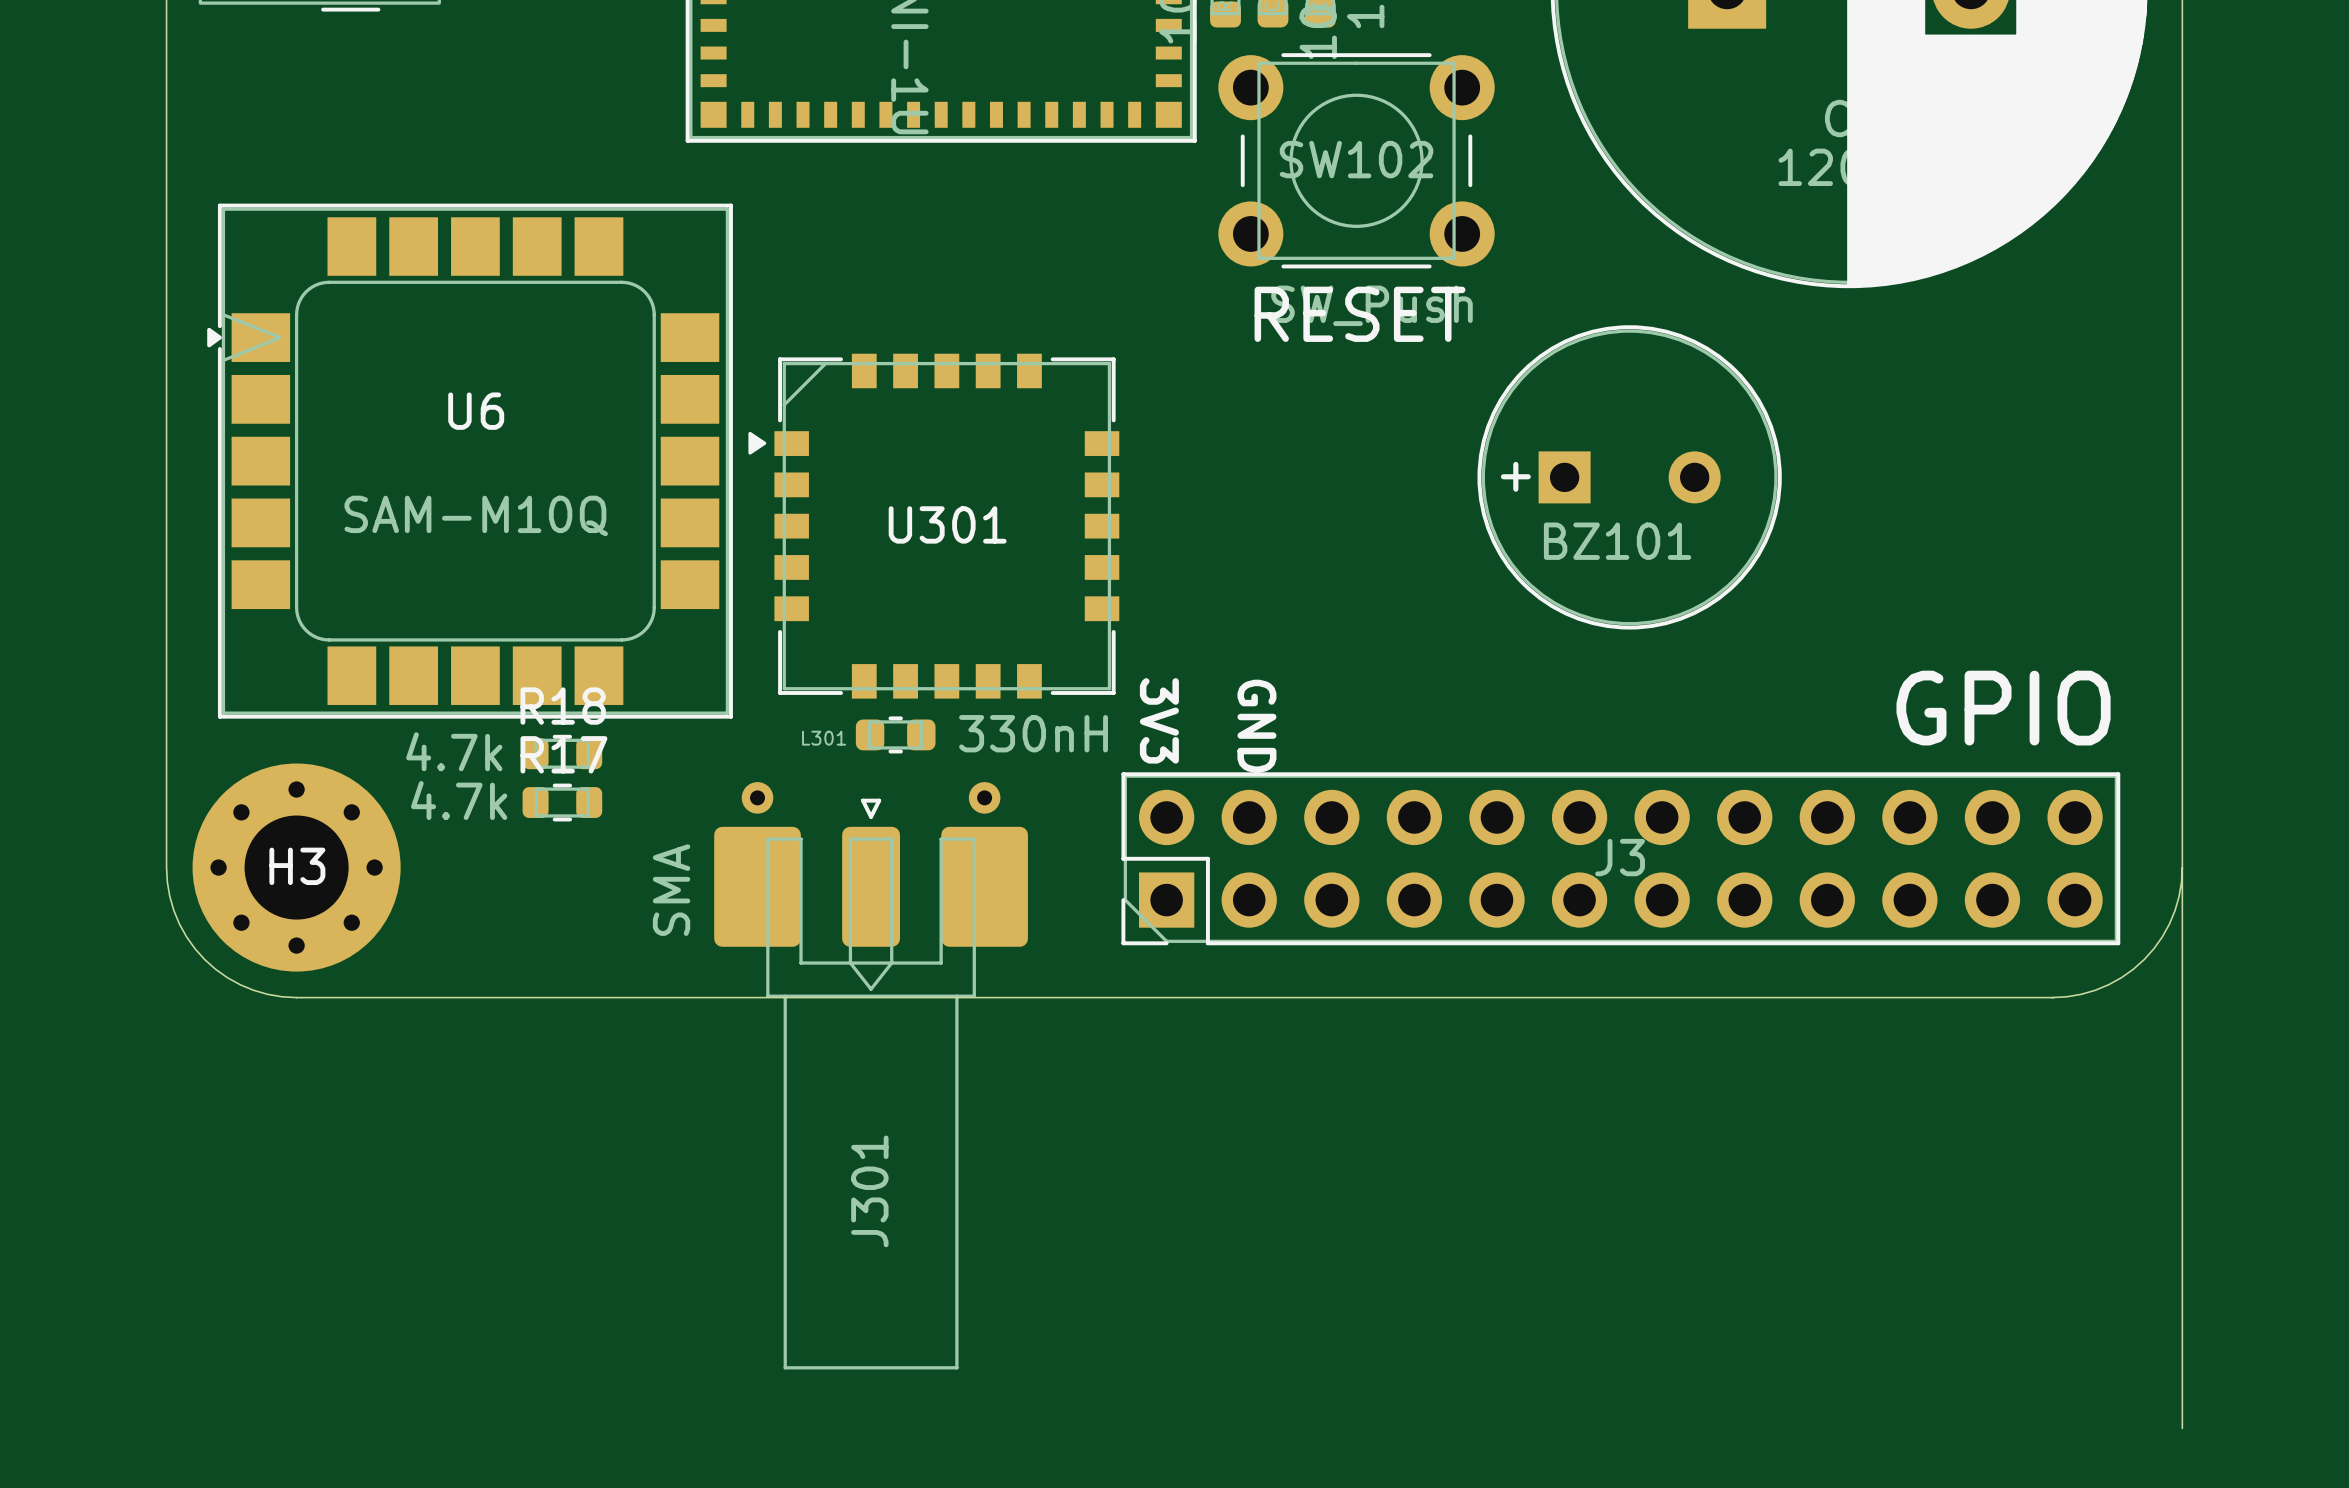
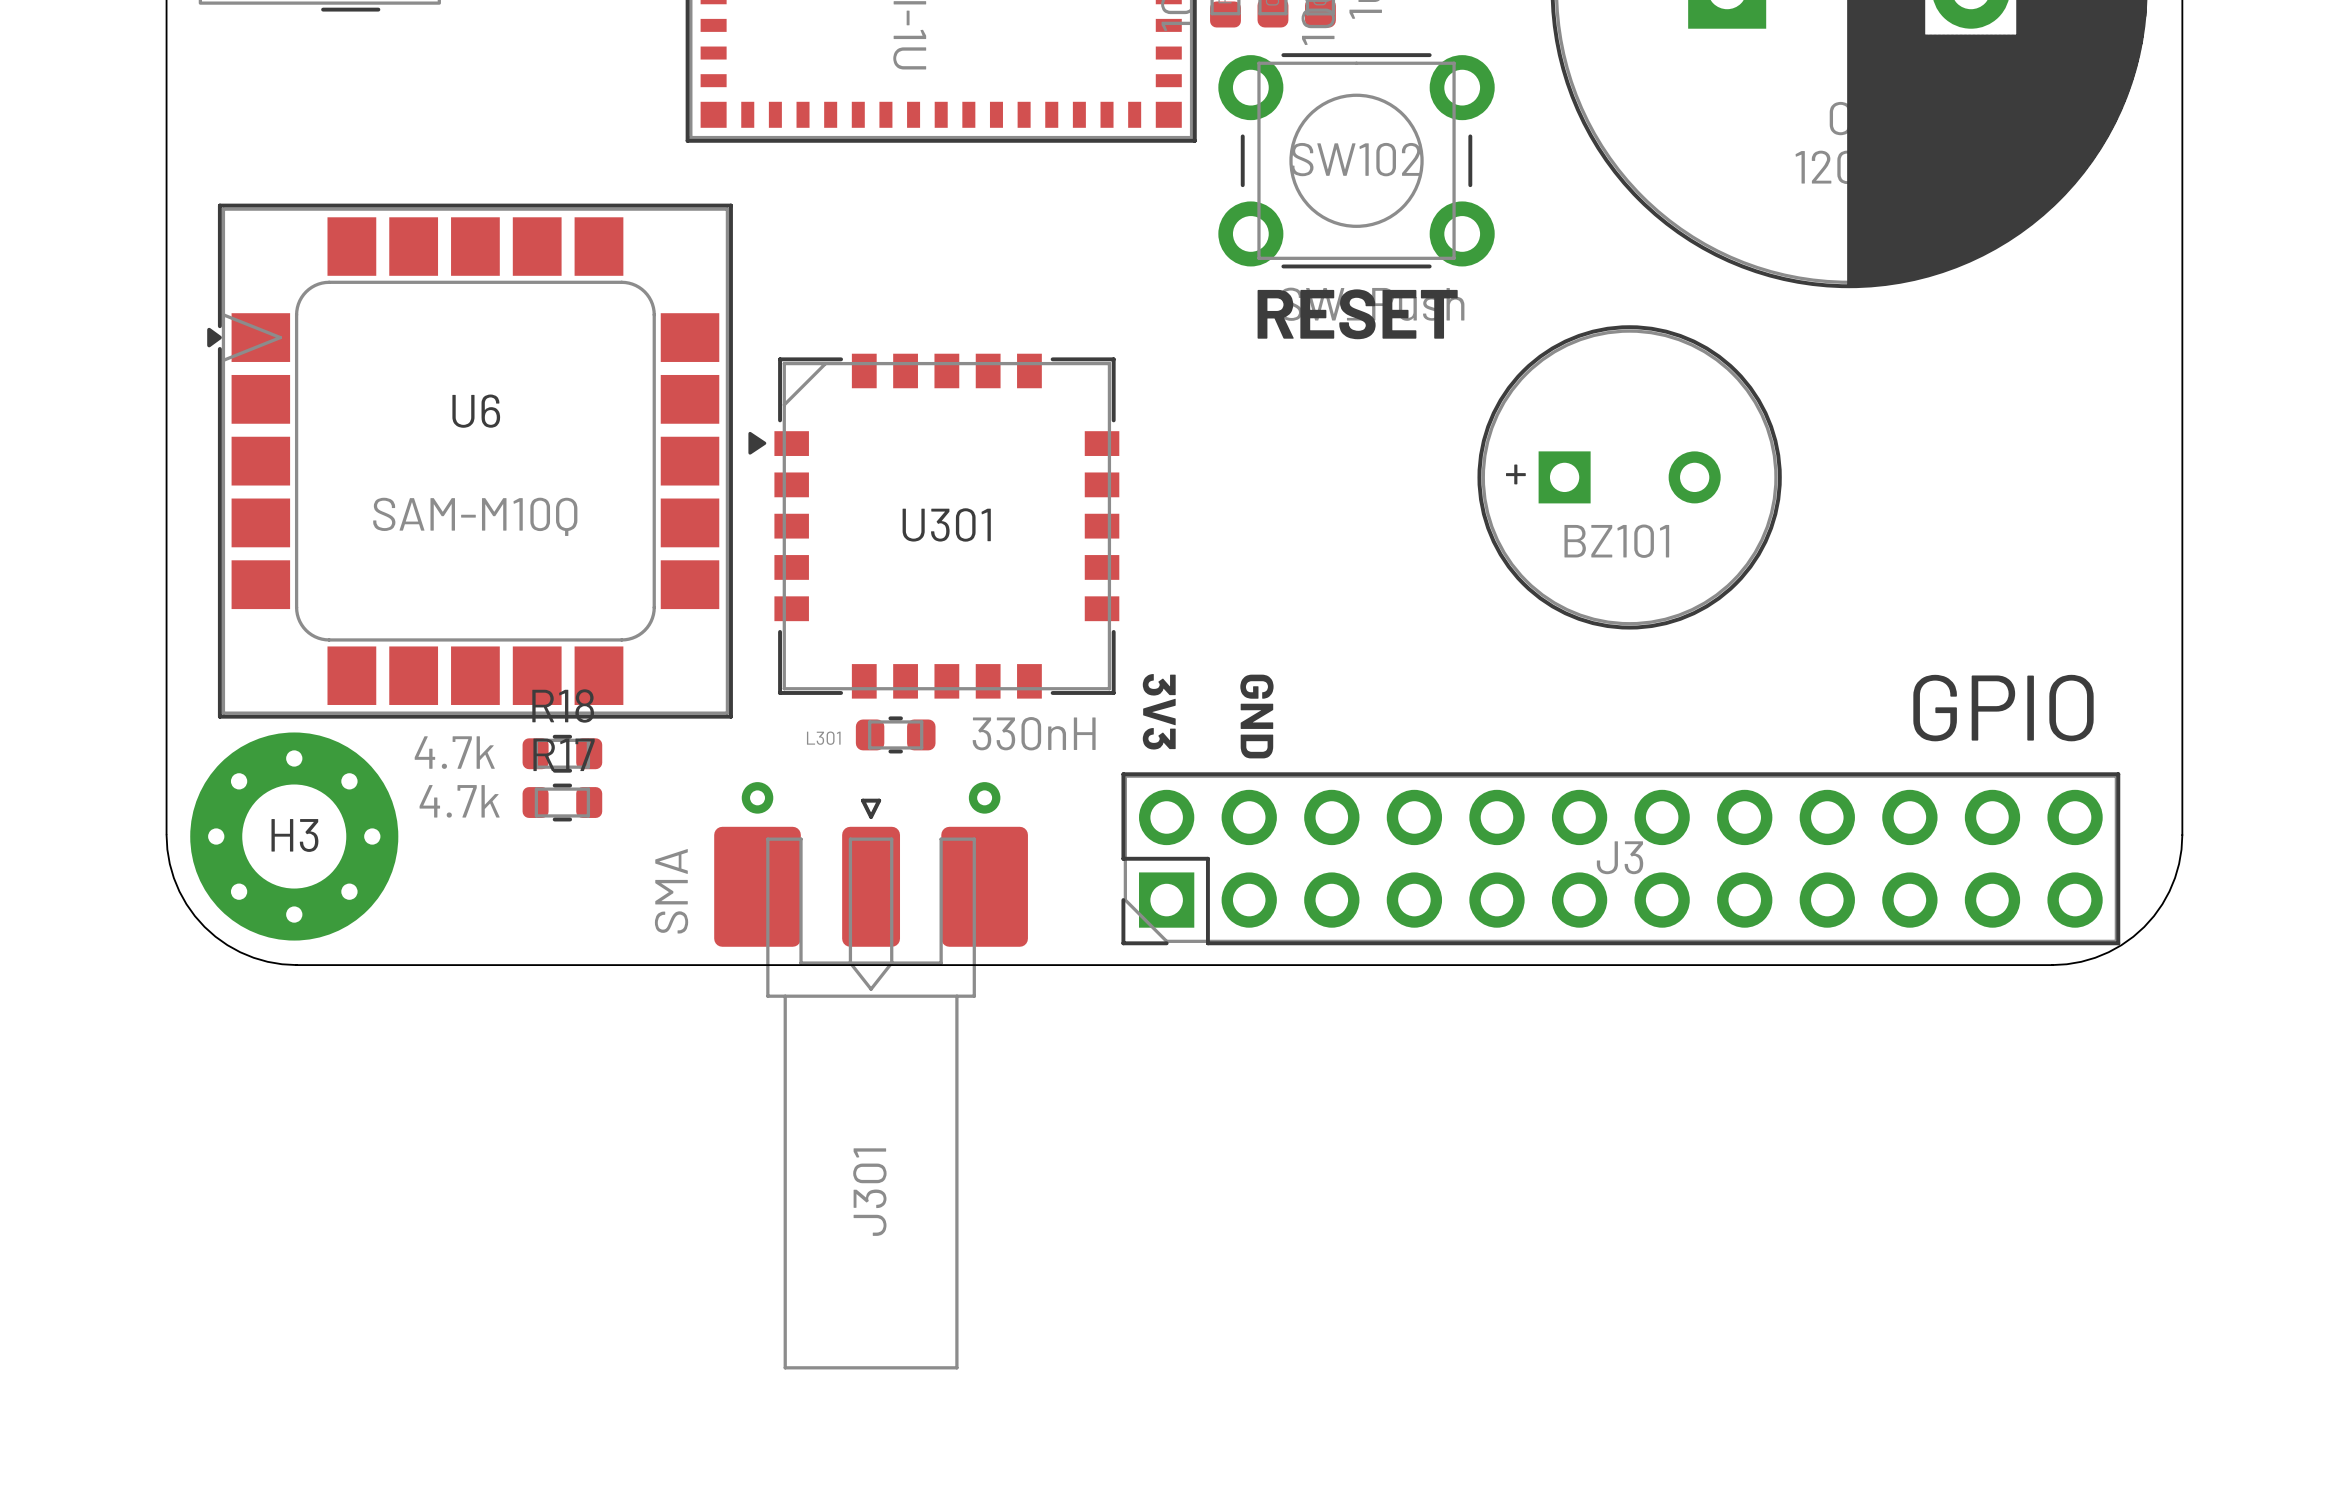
board edge: (166, 834) (166, 866) -> (166, 835) (169, 863) (179, 891) (186, 904) (204, 926) (227, 945) (240, 952) (267, 961) (296, 965)
board edge: (2182, 835) (2182, 1428) -> (2182, 835) (2179, 863) (2169, 891) (2153, 916) (2144, 926) (2121, 945) (2095, 957) (2066, 964) (2052, 965)
board edge: (166, 867) (169, 896) (179, 923) (194, 948) (204, 959) (227, 977) (240, 984) (253, 990) (282, 996) (2052, 997) -> none
H3 position: (296, 867) -> (294, 836)
board edge: (2182, 867) (2179, 896) (2169, 923) (2153, 948) (2144, 959) (2133, 969) (2108, 984) (2081, 994) (2052, 997) -> none
board edge: none -> (296, 965) (2052, 965)

